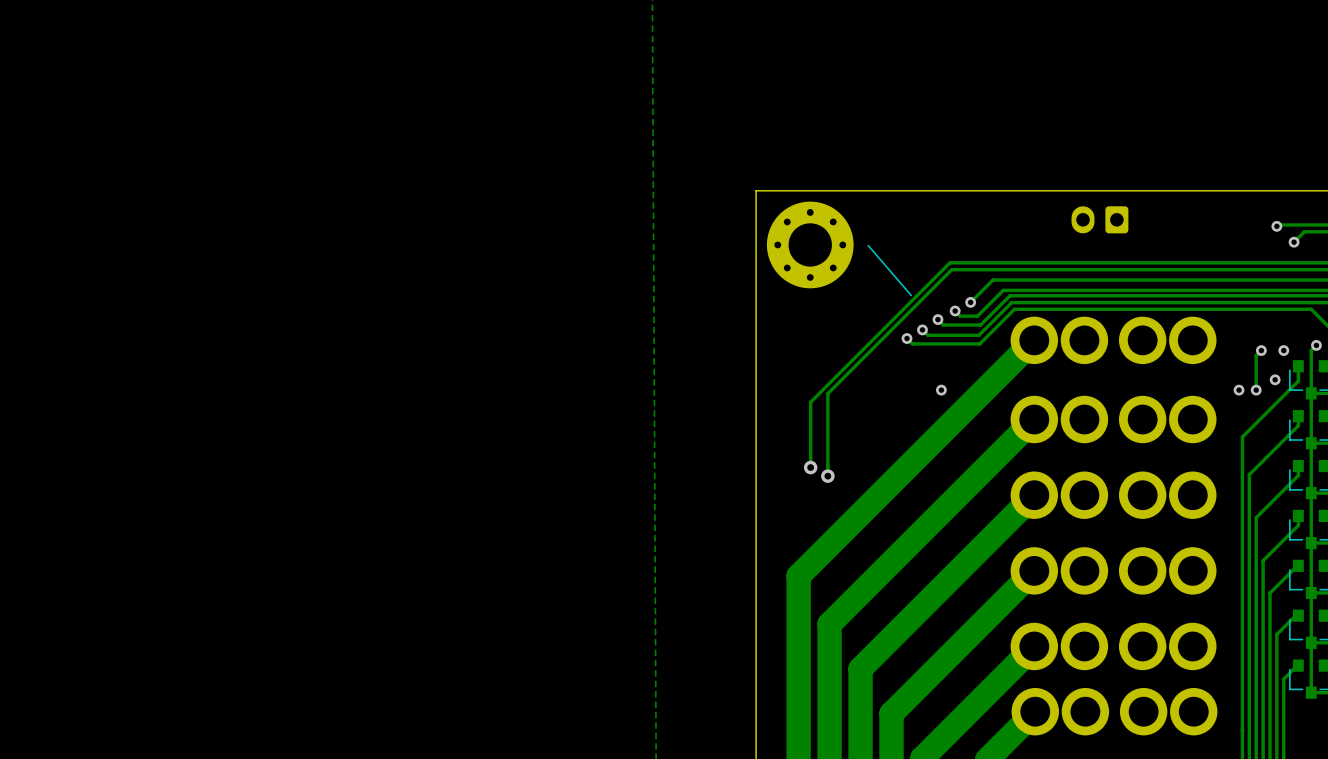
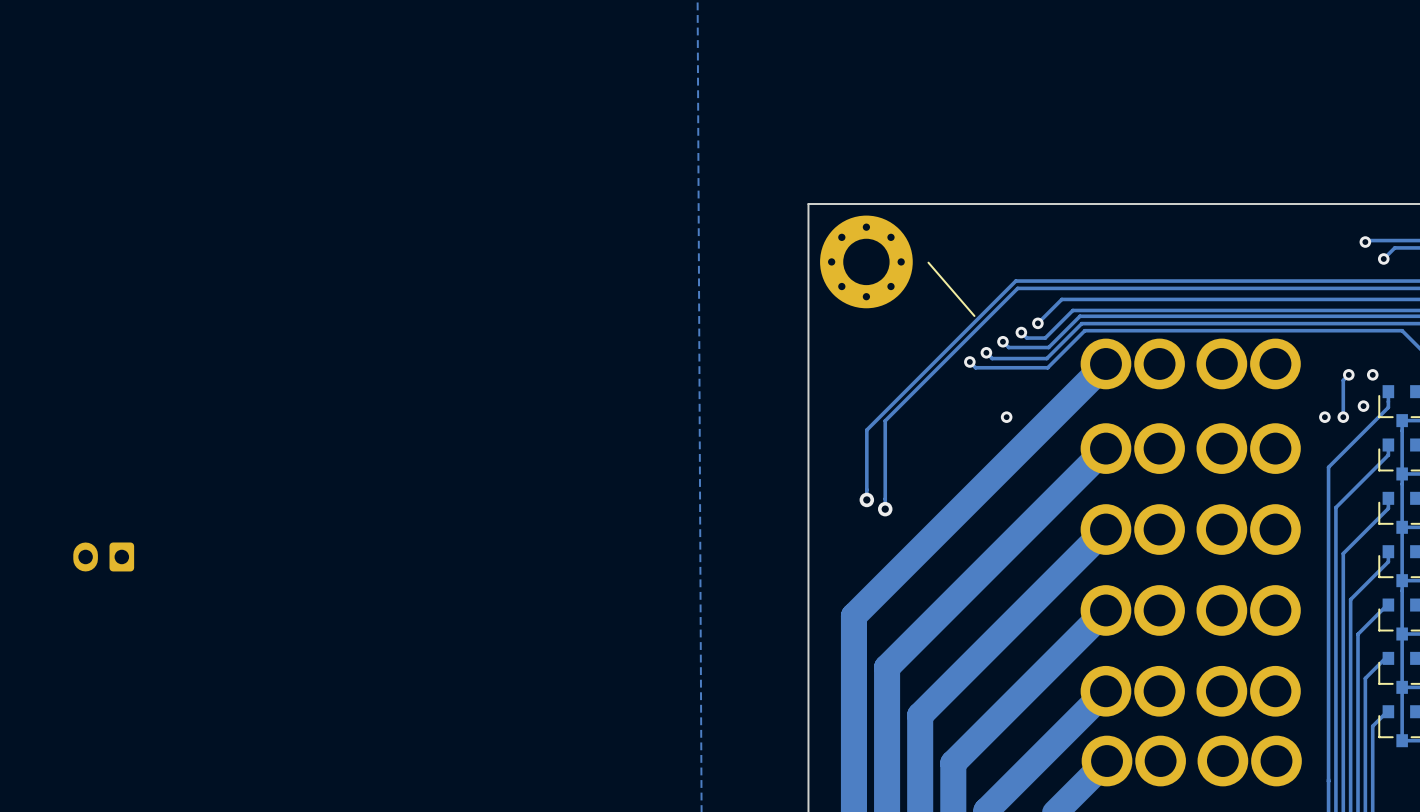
part: (1099, 219) -> none
track: (1316, 345) (1311, 350) (1311, 393) -> none
via: (1316, 345) -> none
part: none -> (103, 556)

